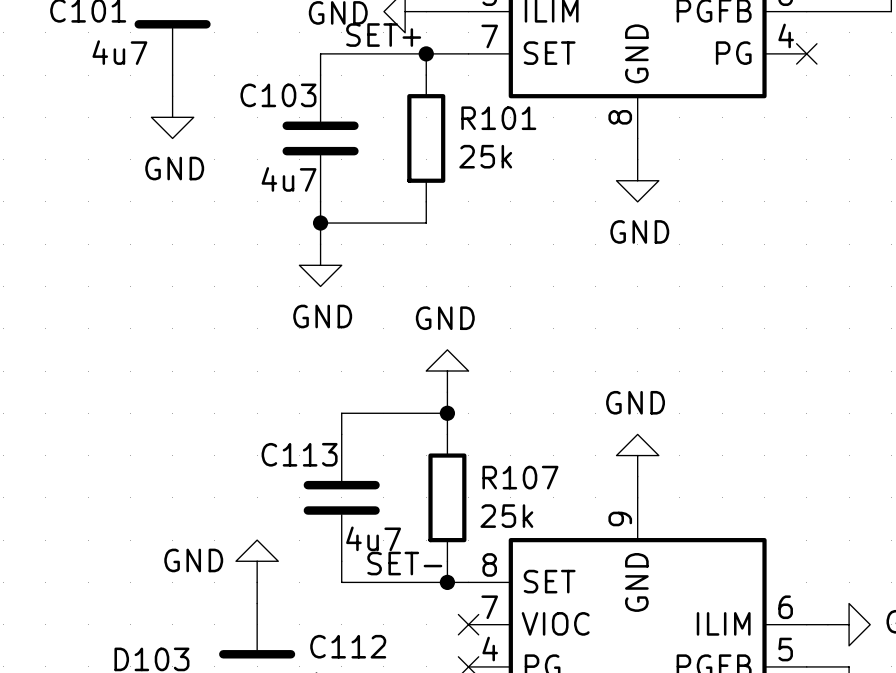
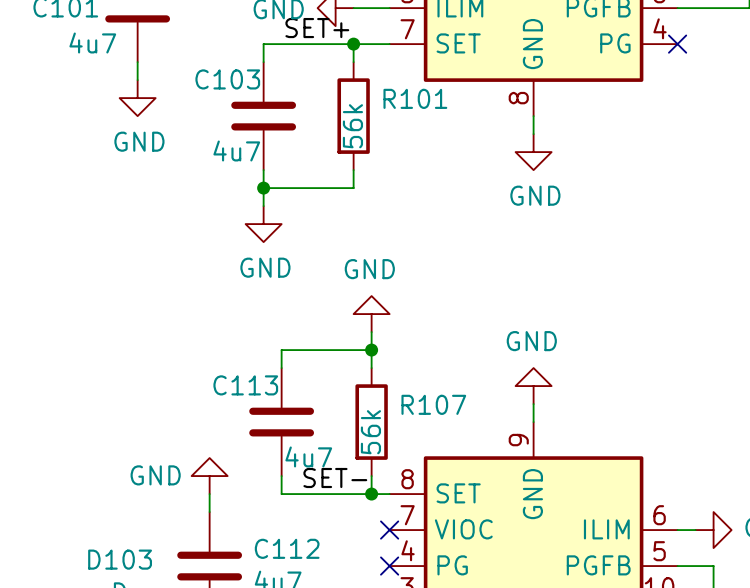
R101 value: 25k (485, 156) -> 56k (352, 126)
R107 value: 25k (506, 516) -> 56k (370, 432)

